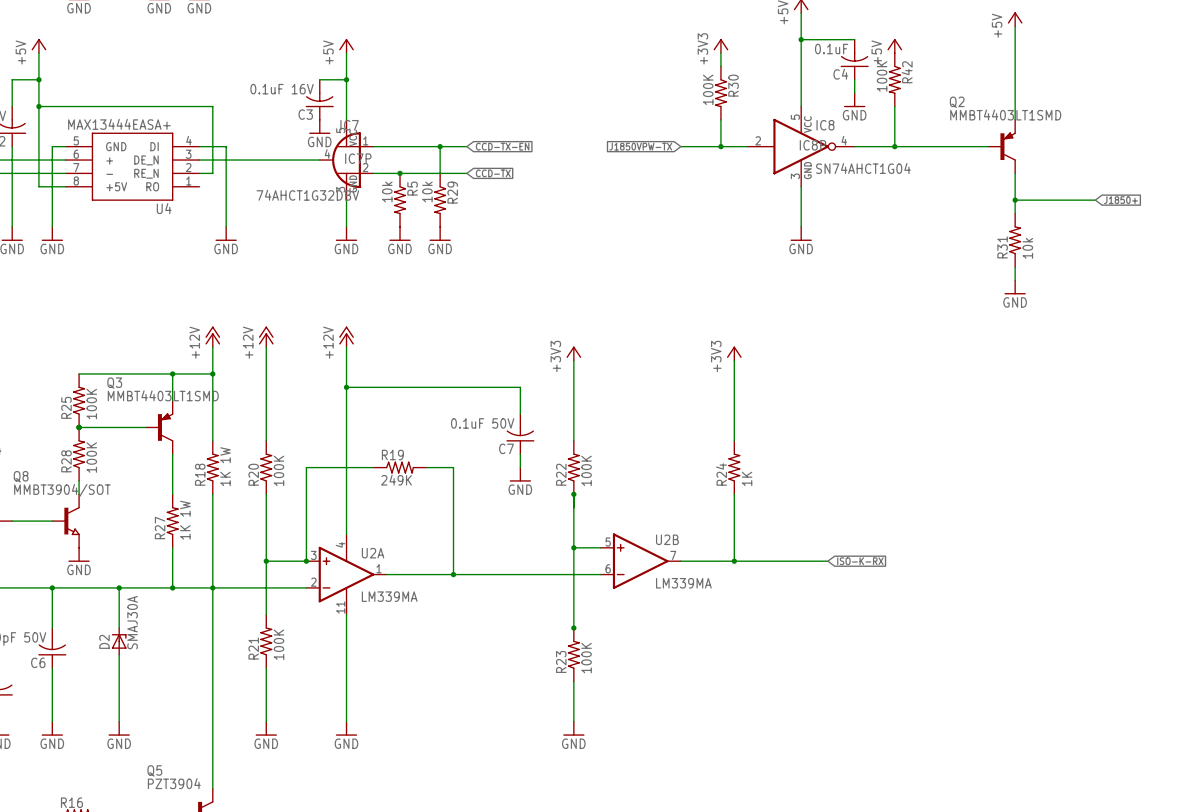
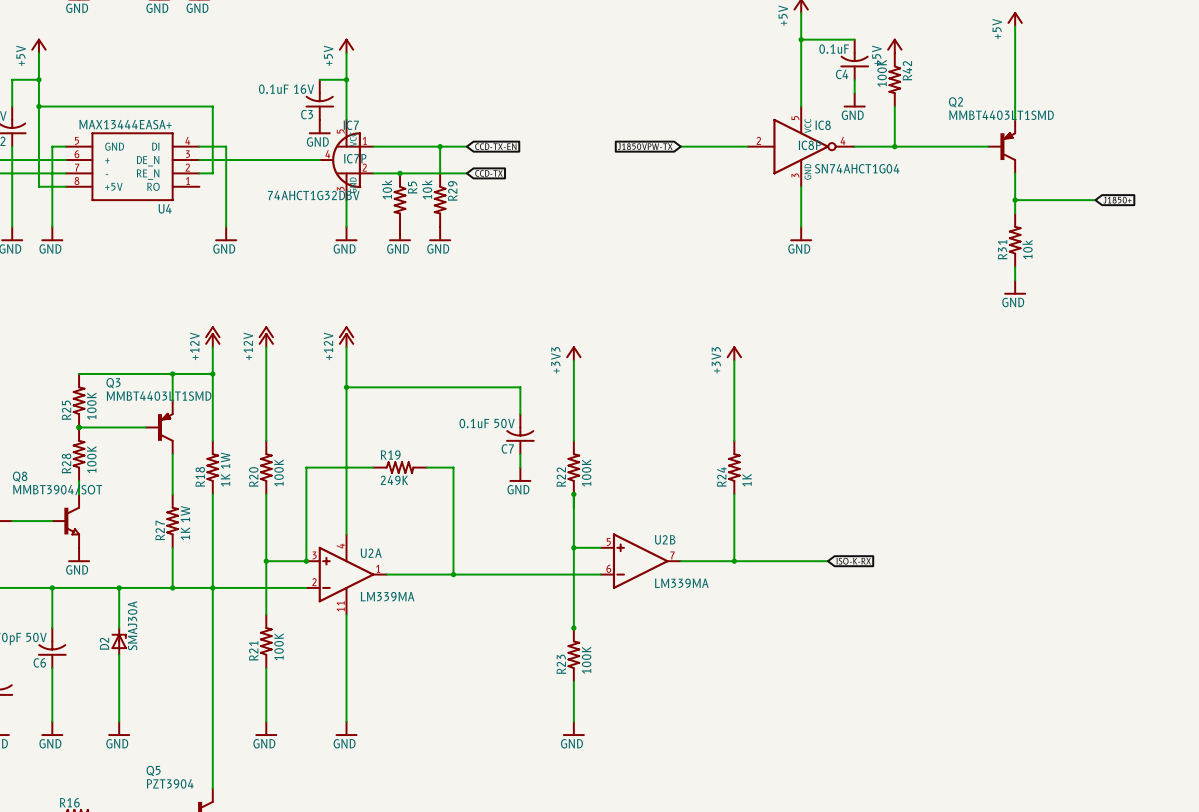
power symbol: +3V3 (720, 46) -> none
wire: (720, 53) (720, 66) -> none
R30: 100K (720, 93) -> none
wire: (720, 119) (720, 146) -> none
junction: (720, 146) -> none

